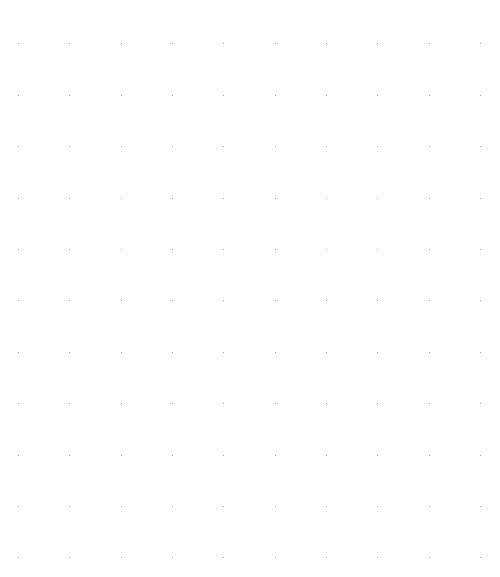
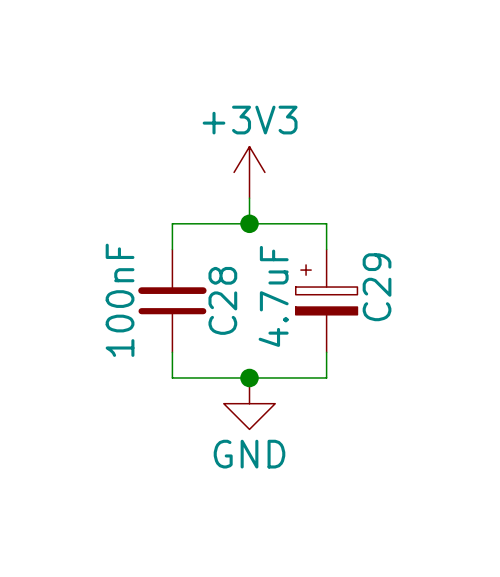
power symbol: none -> +3V3 (249, 172)
wire: none -> (249, 198) (249, 223)
junction: none -> (249, 223)
wire: none -> (172, 249) (172, 223) (326, 223) (326, 249)
C28: none -> 100nF (172, 300)
C29: none -> 4.7uF (326, 300)
wire: none -> (172, 352) (172, 377) (326, 377) (326, 352)
junction: none -> (249, 377)
power symbol: none -> GND (249, 403)

